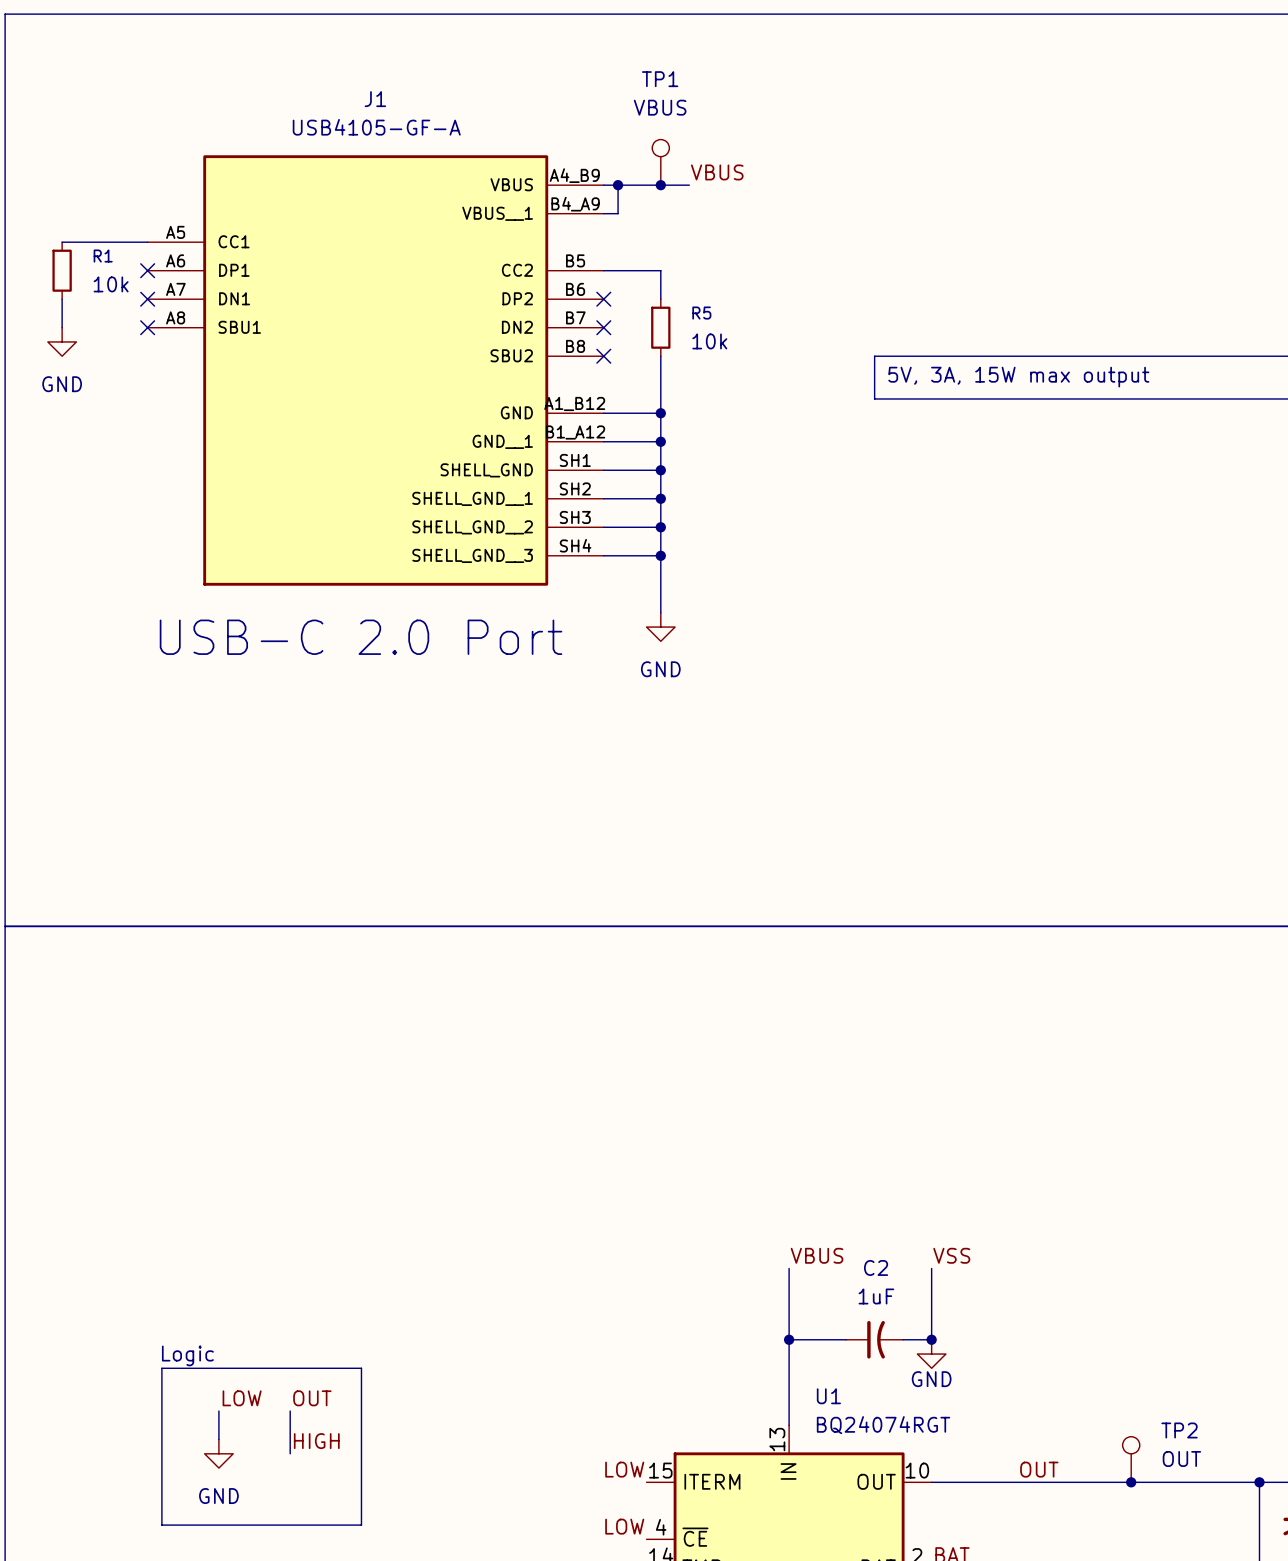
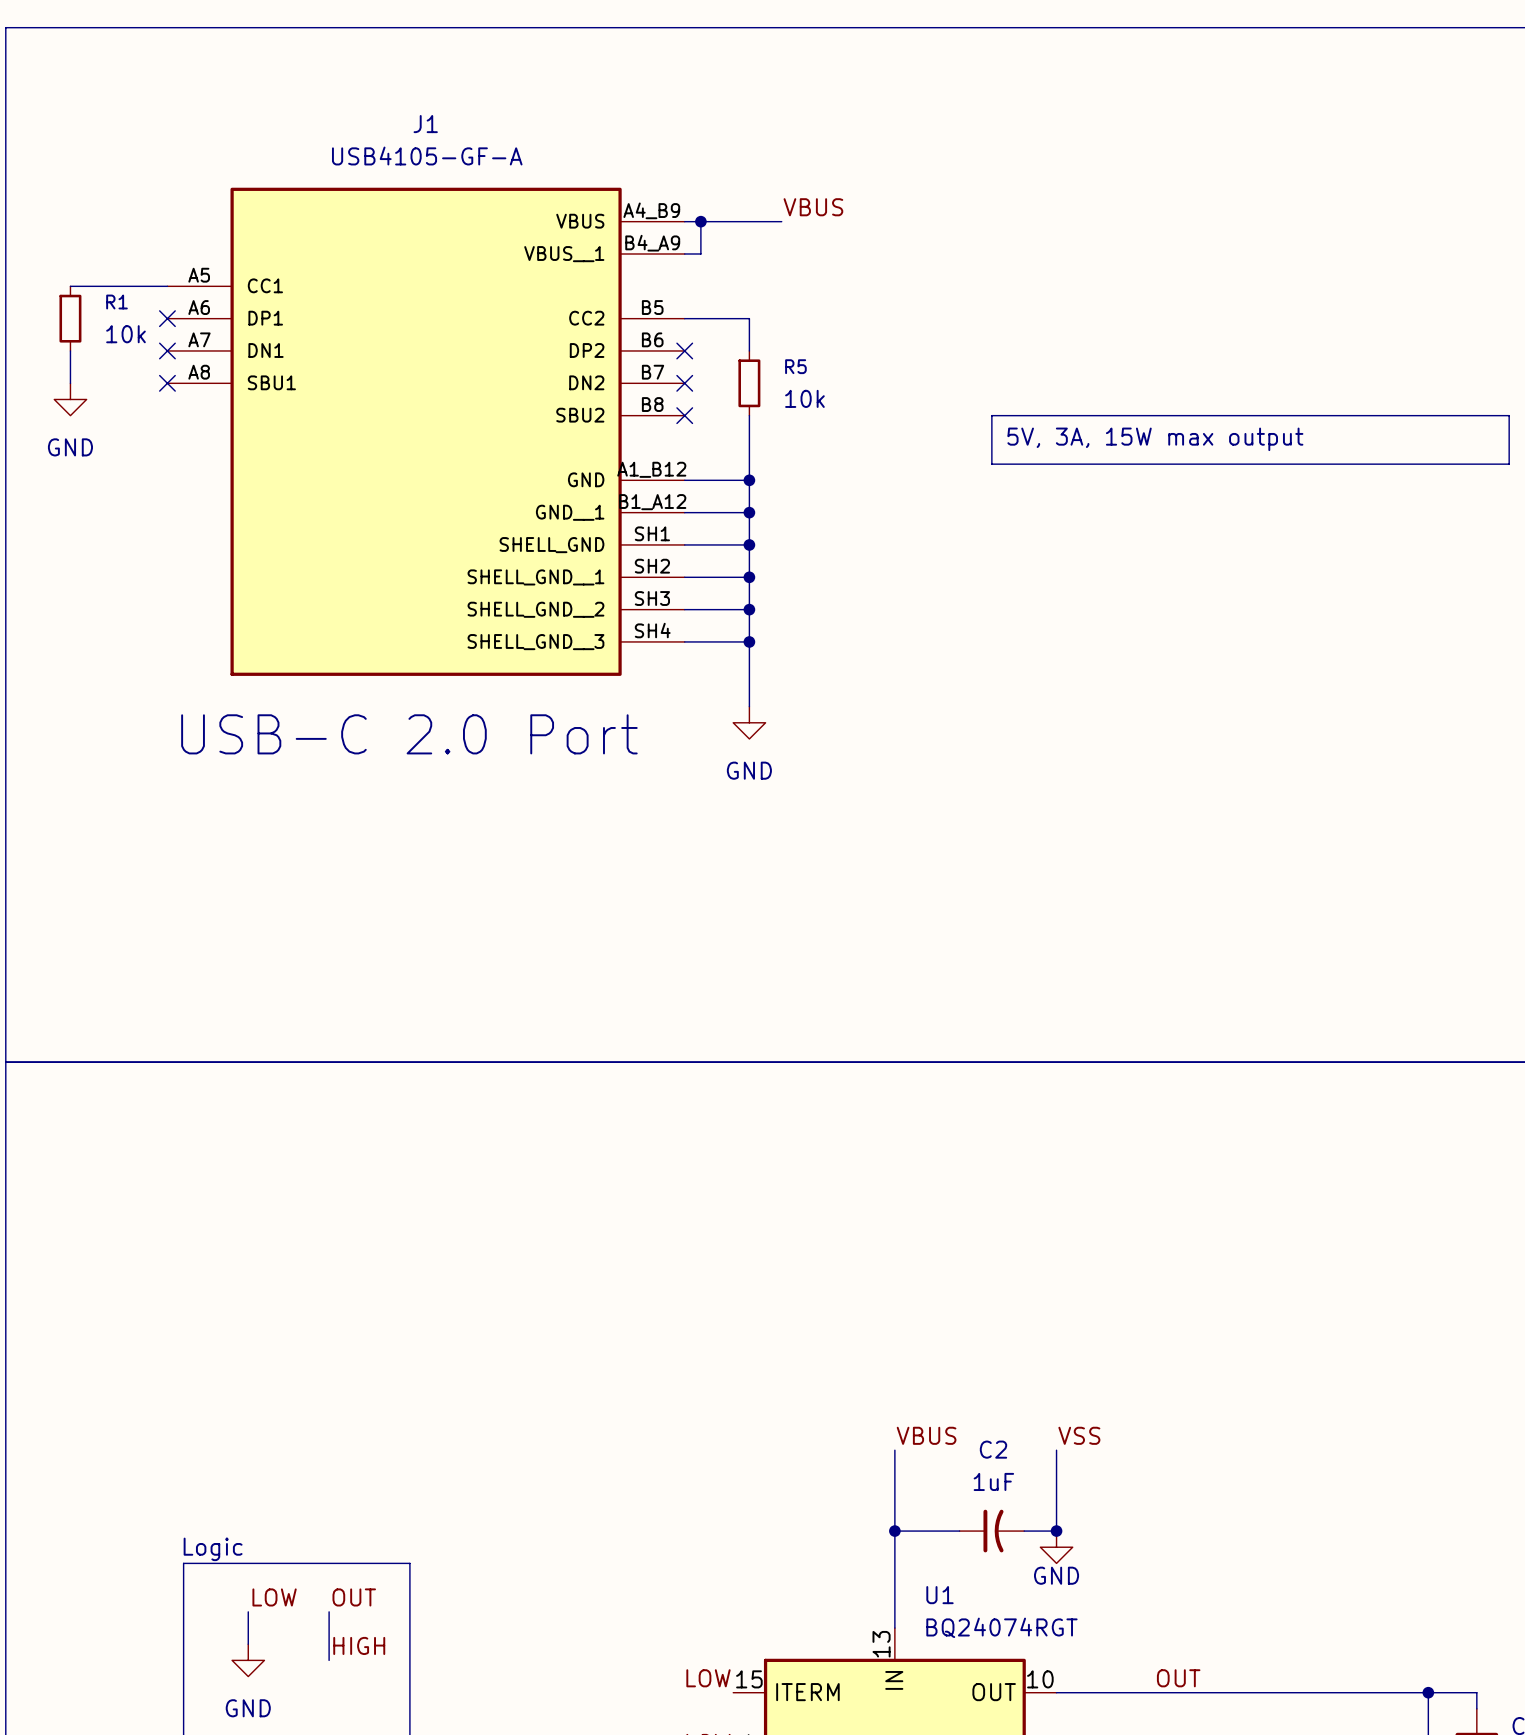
TP1: VBUS (660, 162) -> none
junction: (660, 185) -> none
TP2: OUT (1131, 1459) -> none
junction: (1131, 1482) -> none

